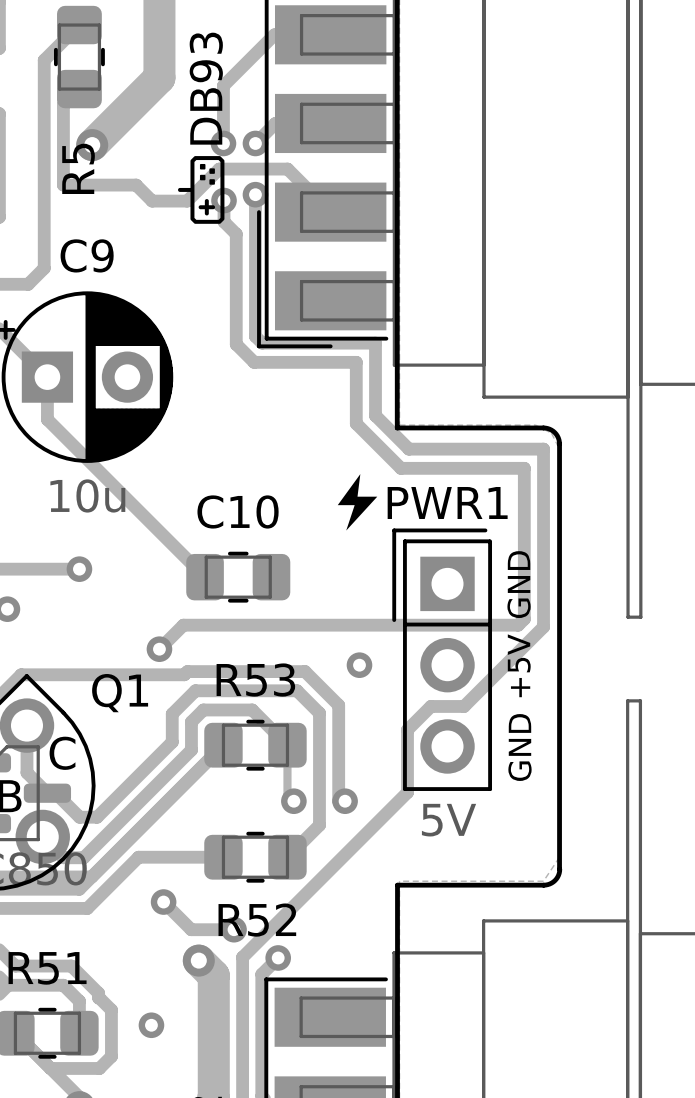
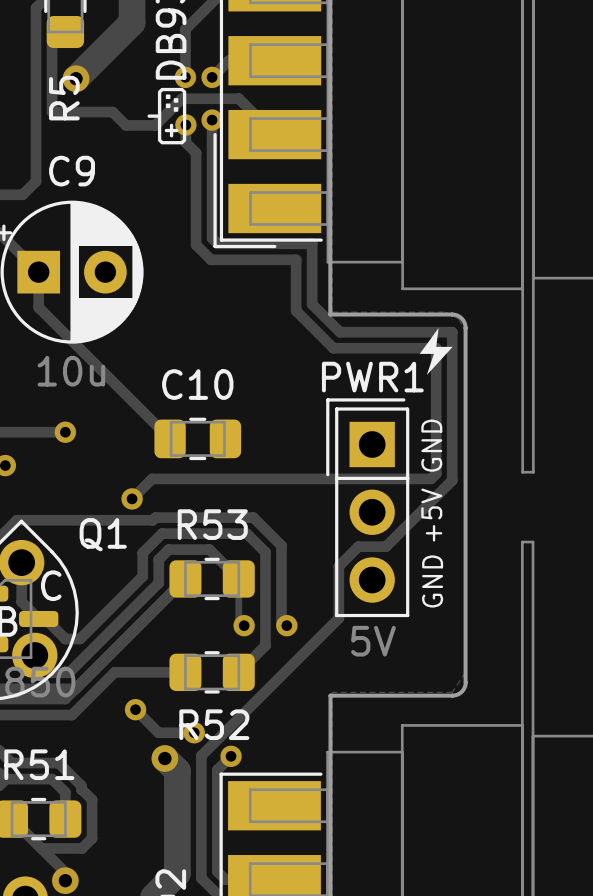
drawing position: (357, 502) -> (436, 351)
via: (359, 665) -> none
via: (151, 1025) -> none

